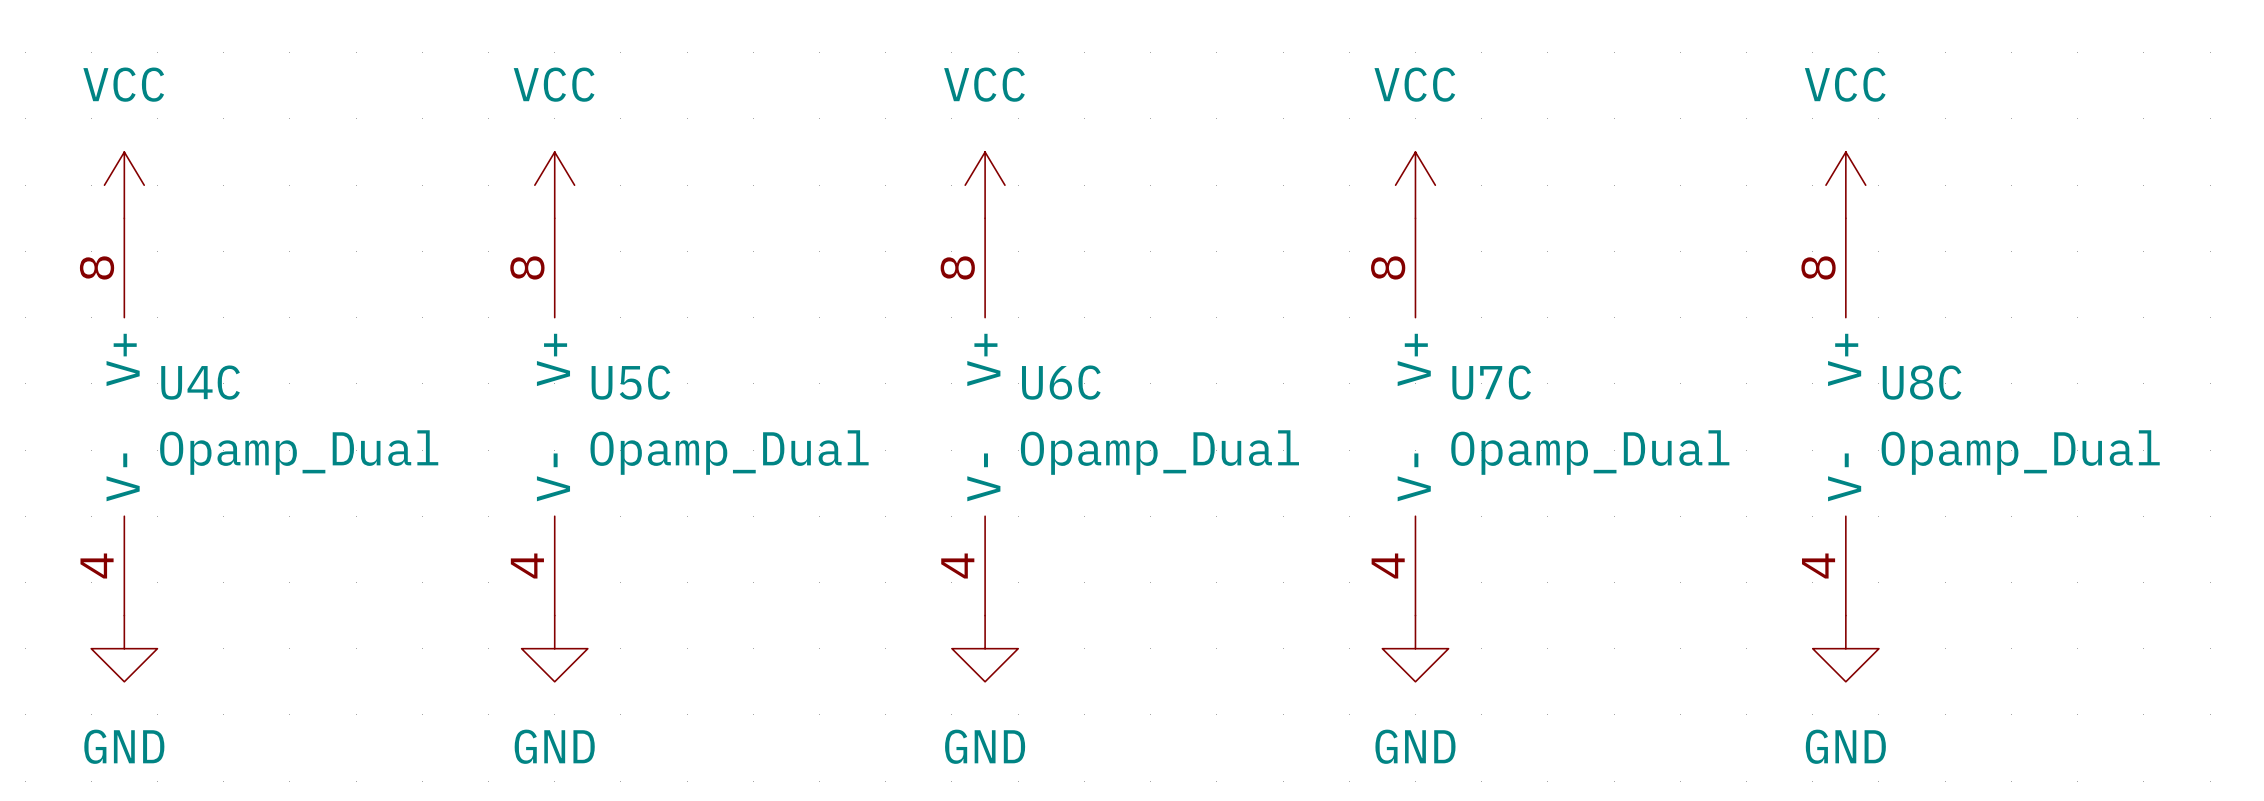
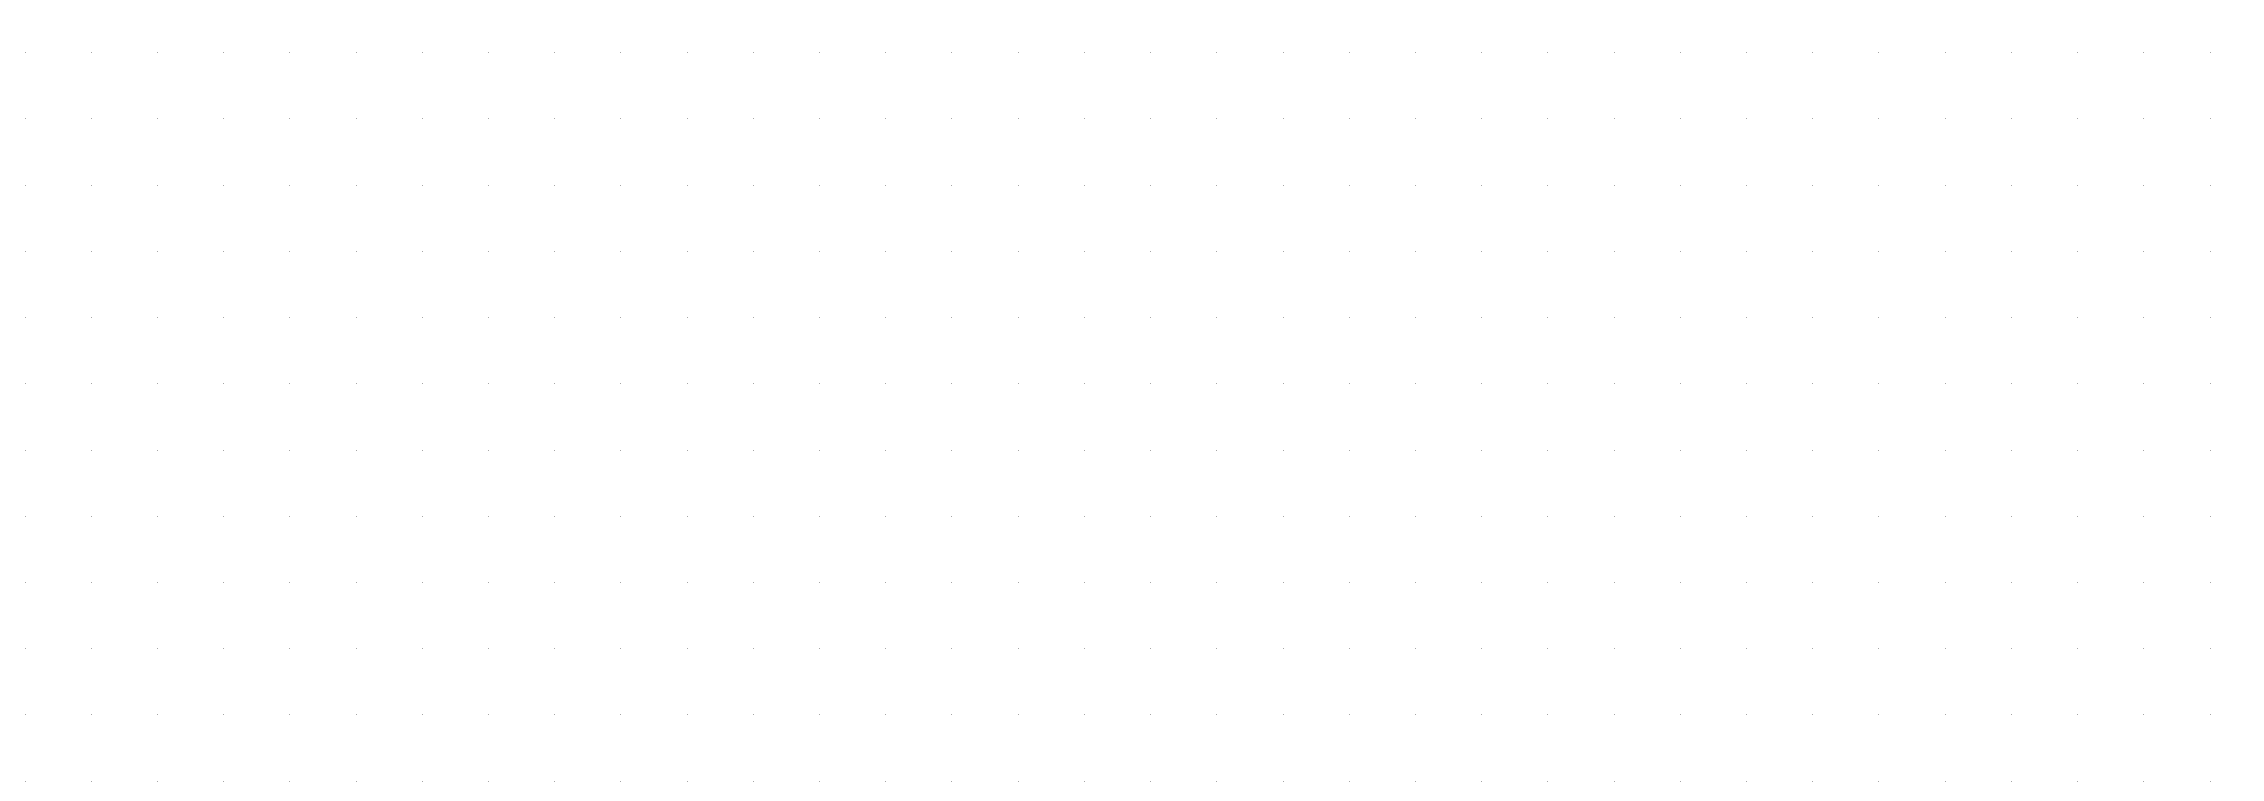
power symbol: VCC (124, 185) -> none
power symbol: VCC (554, 185) -> none
power symbol: VCC (985, 185) -> none
power symbol: VCC (1415, 185) -> none
power symbol: VCC (1845, 185) -> none
U4C: Opamp_Dual (124, 416) -> none
U5C: Opamp_Dual (554, 416) -> none
U6C: Opamp_Dual (985, 416) -> none
U7C: Opamp_Dual (1415, 416) -> none
U8C: Opamp_Dual (1845, 416) -> none
power symbol: GND (124, 648) -> none
power symbol: GND (554, 648) -> none
power symbol: GND (985, 648) -> none
power symbol: GND (1415, 648) -> none
power symbol: GND (1845, 648) -> none

